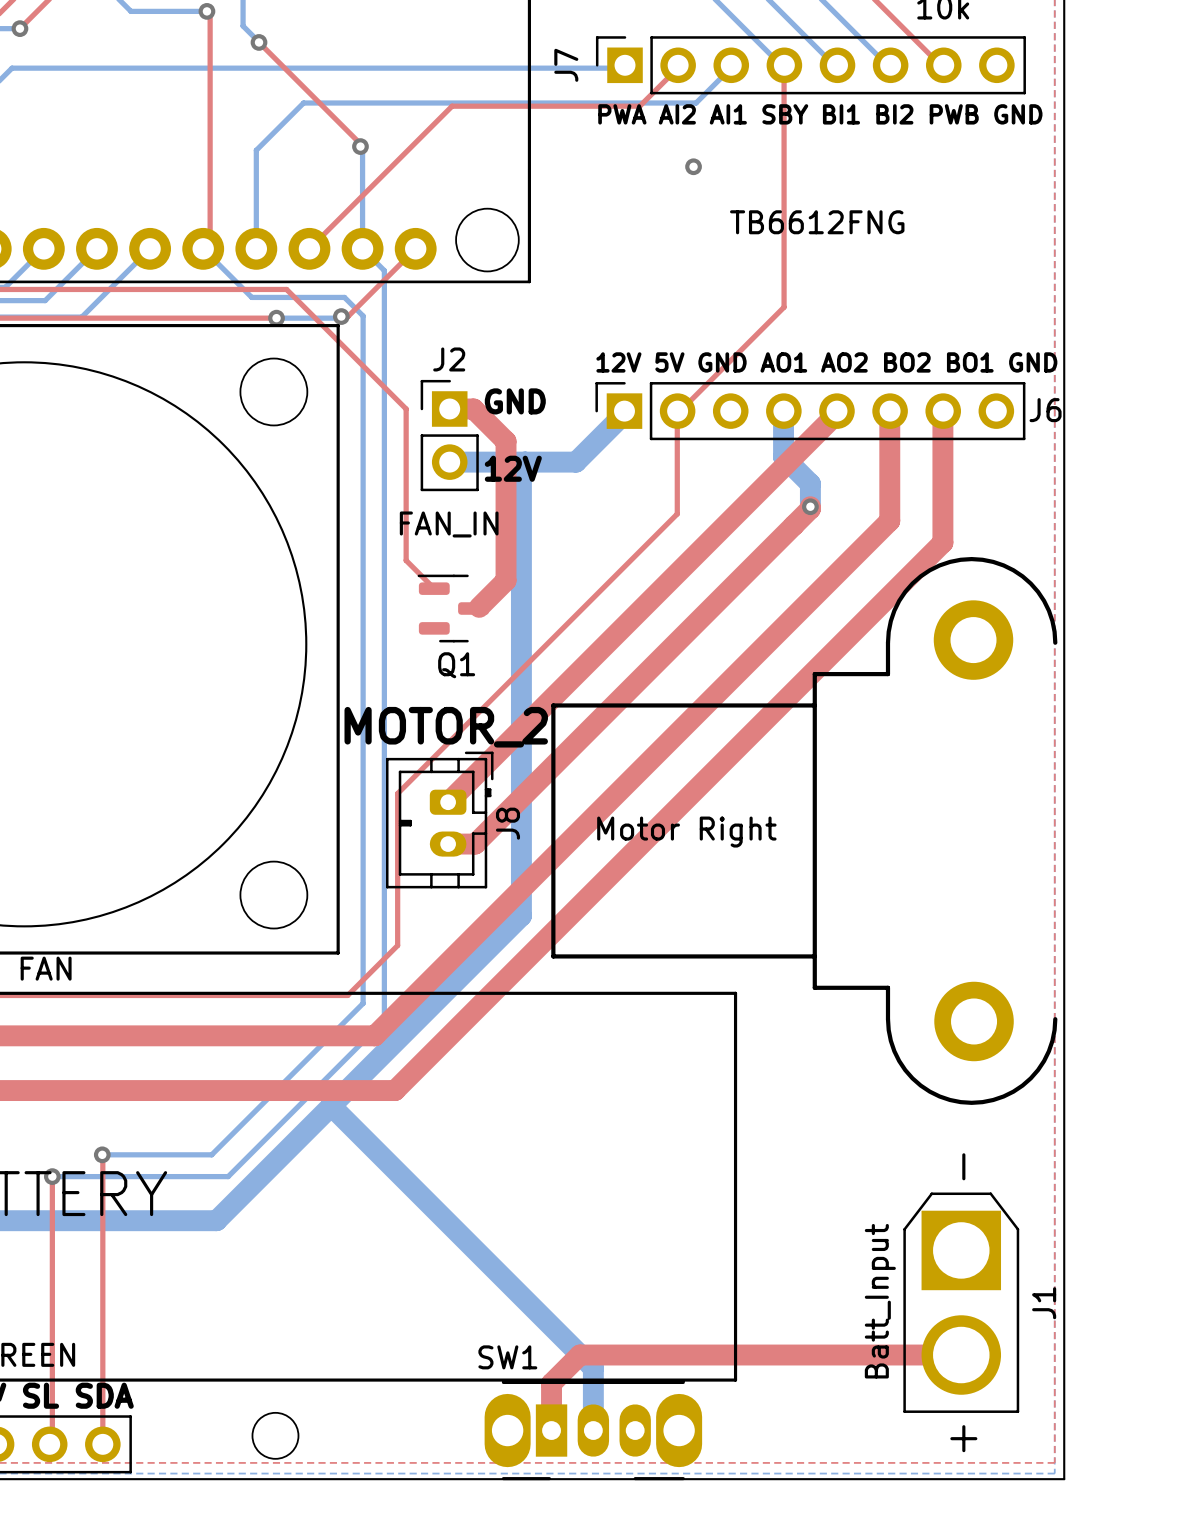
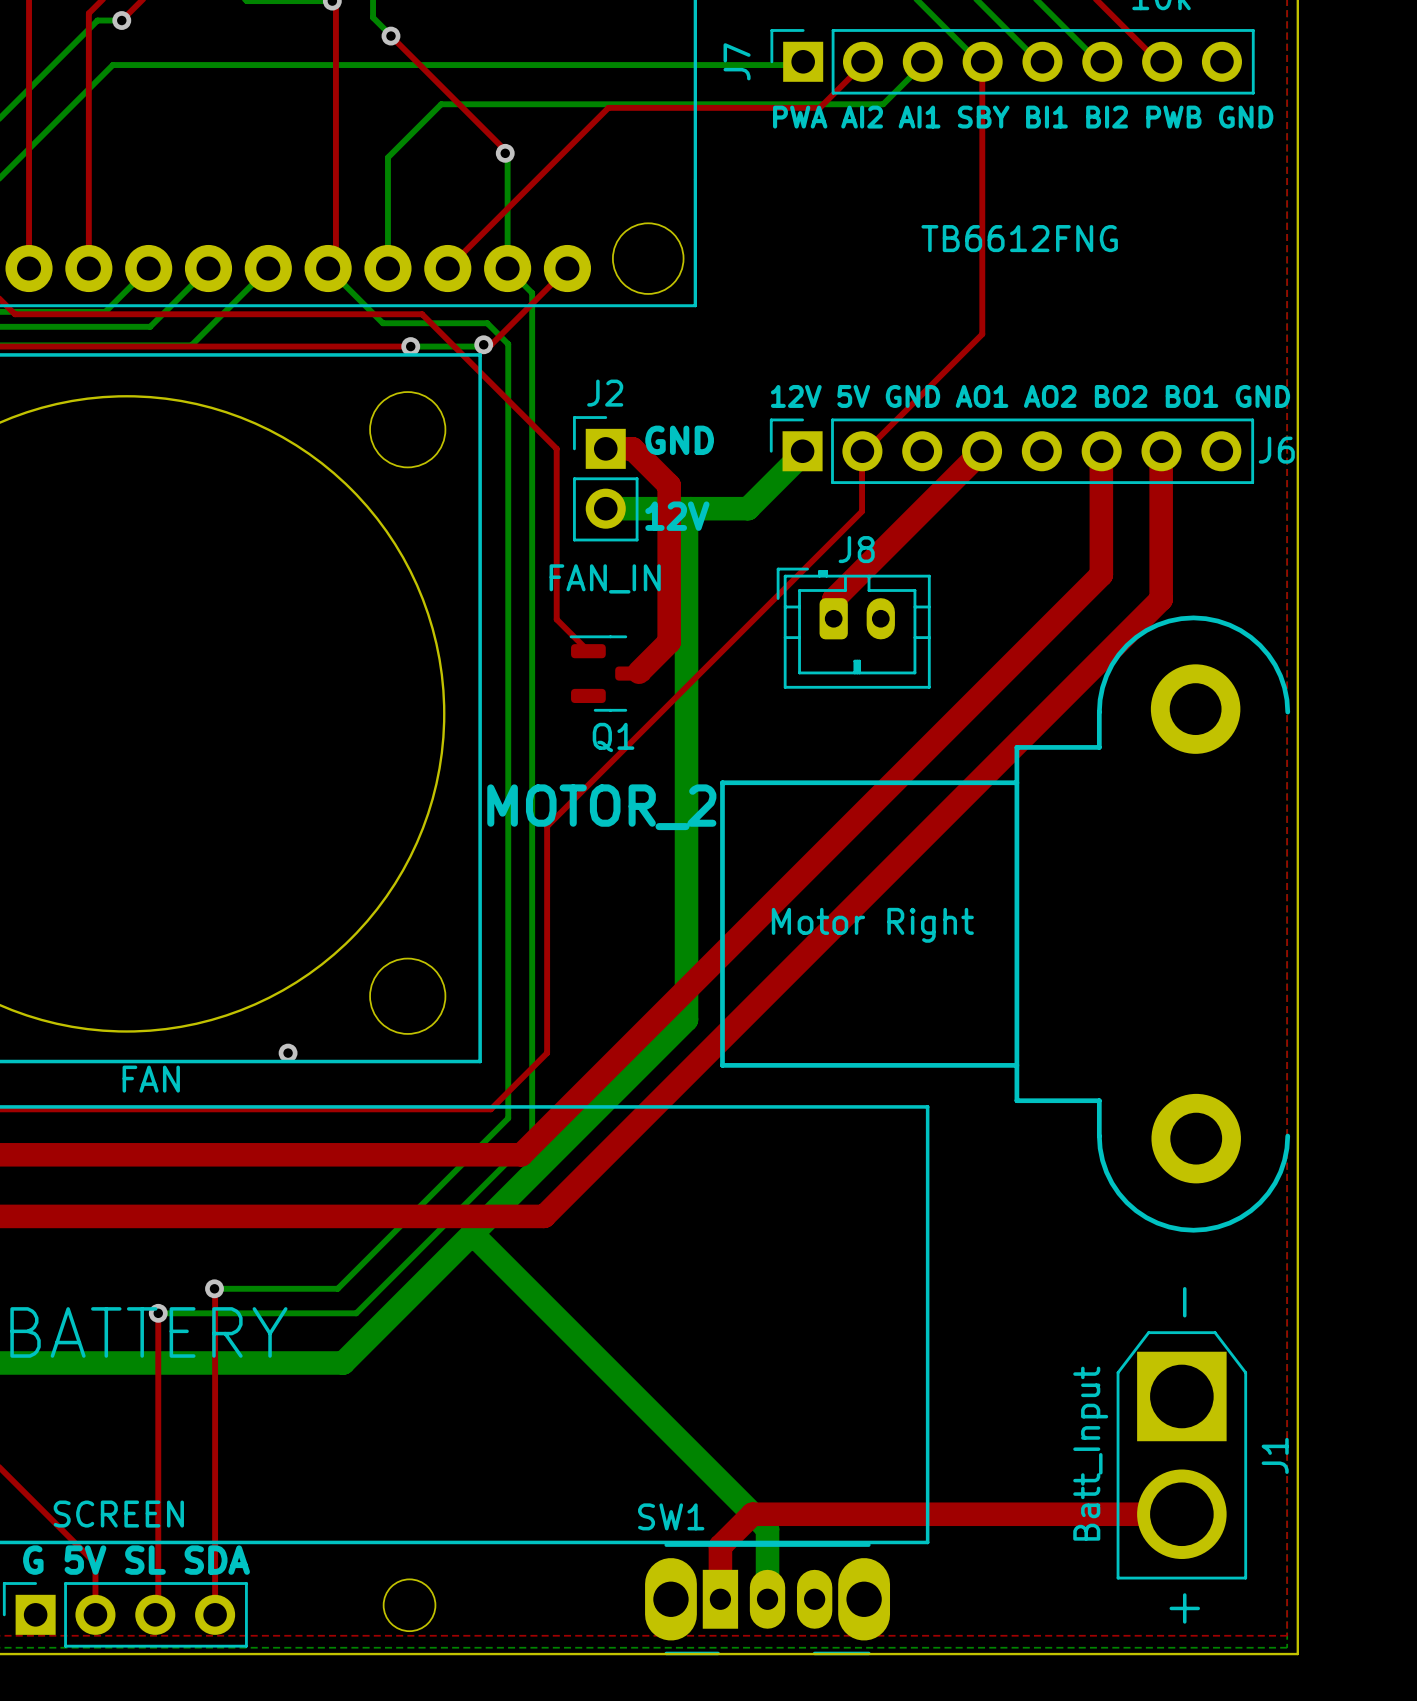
via: (693, 166) -> none
top track: none -> (982, 451) (833, 599) (833, 618)
bottom track: (783, 413) (783, 457) (810, 483) (810, 506) -> none
top track: (836, 413) (448, 802) -> none
top track: (677, 464) (677, 513) (397, 793) -> (862, 511) (547, 826) (547, 881)
top track: (810, 506) (475, 844) (448, 844) -> none
via: (810, 506) -> none
J8 rotation: 0° (439, 820) -> 90° counterclockwise (853, 628)
J8 position: (439, 820) -> (853, 628)
via: none -> (288, 1053)

